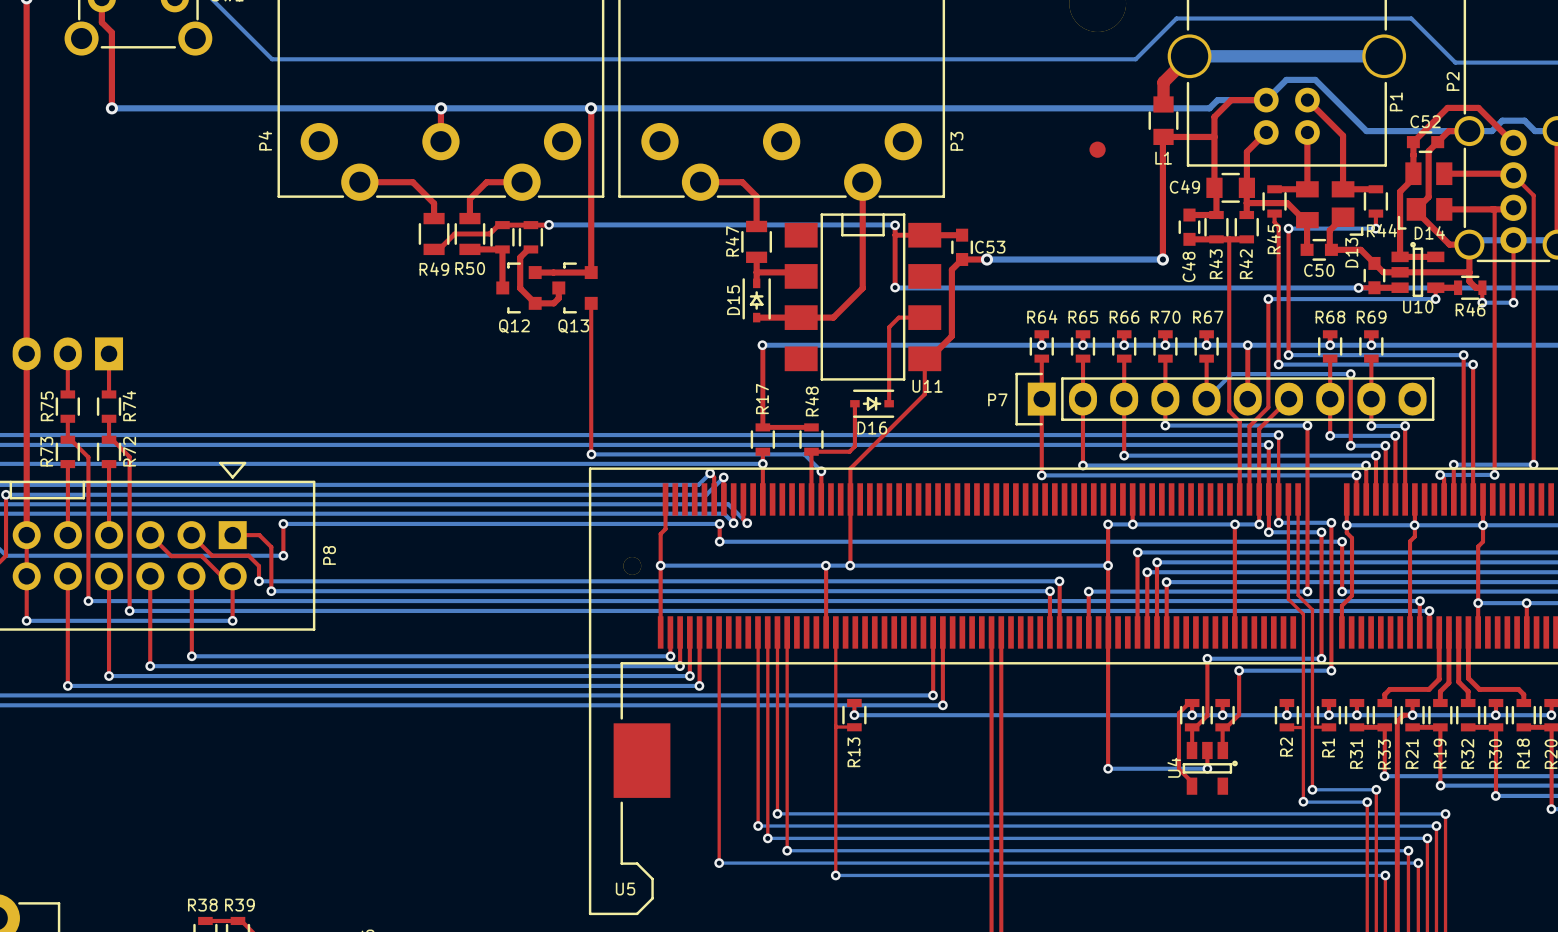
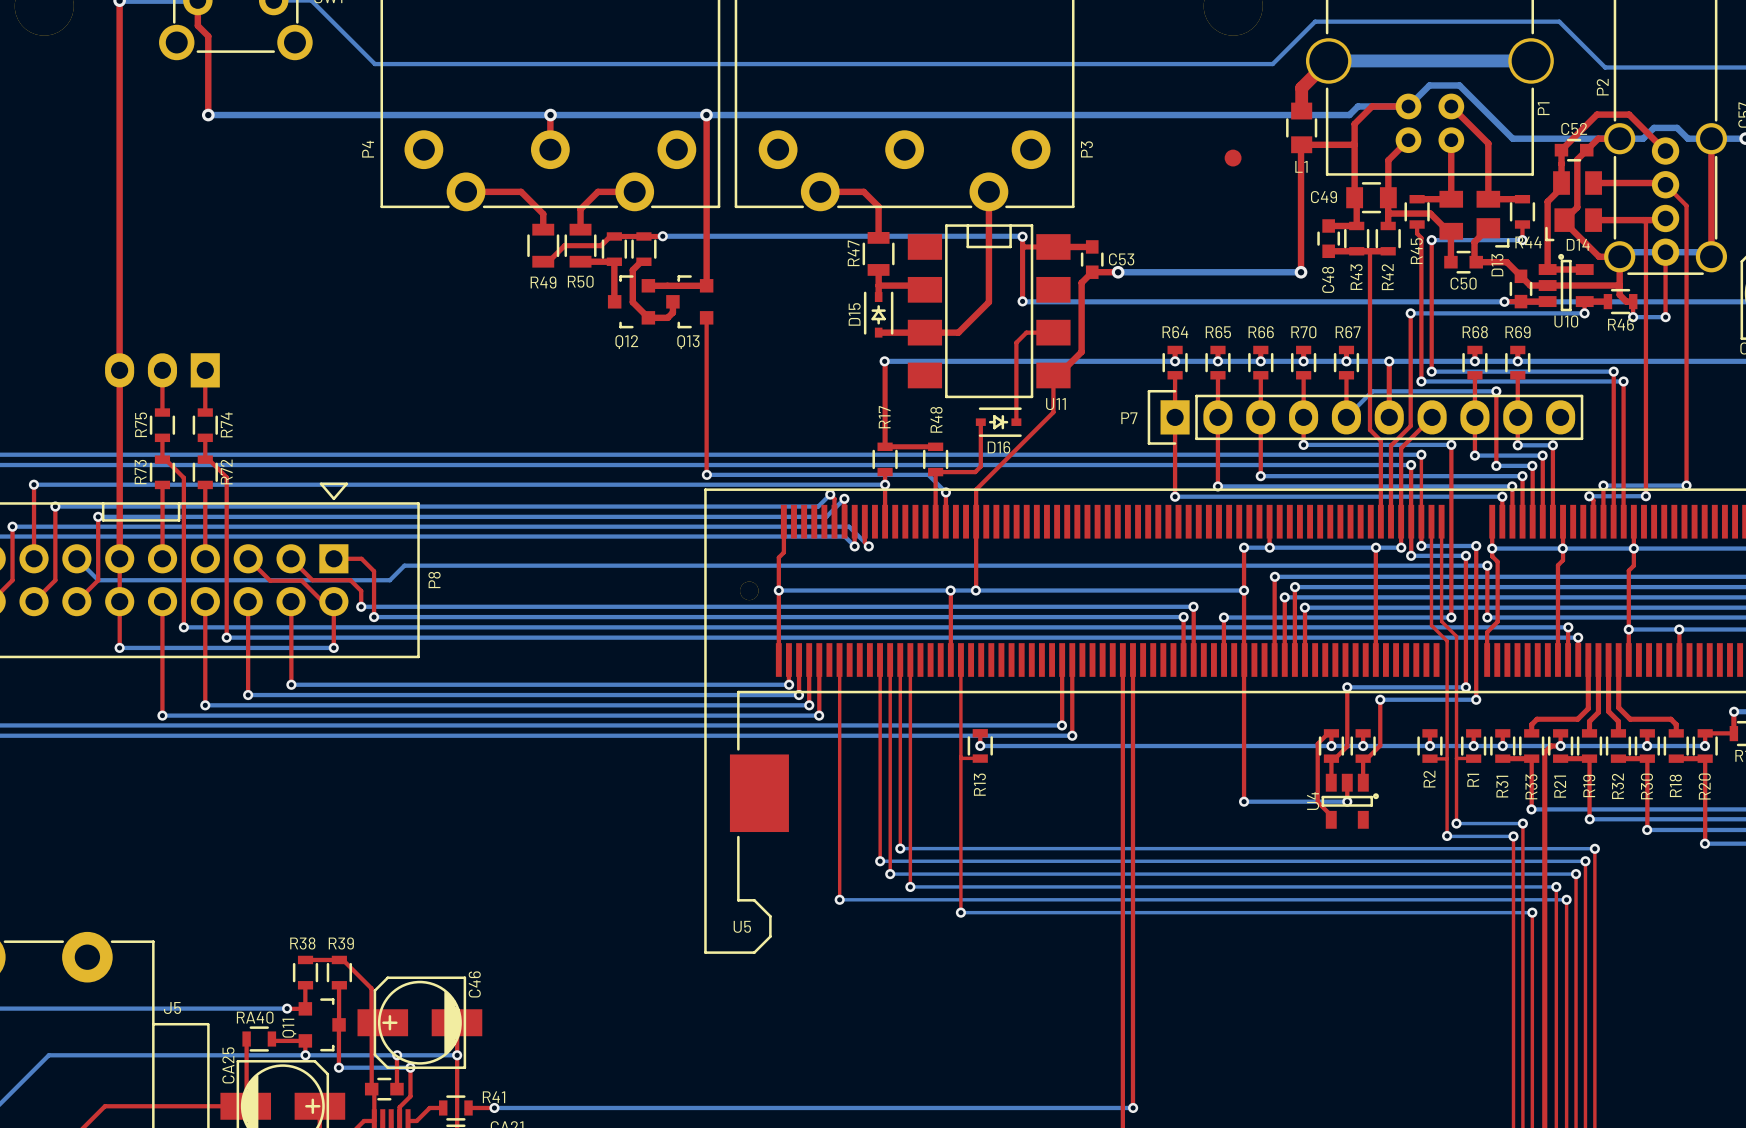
top track: (283, 523) (283, 555) -> none
bottom track: (283, 523) (719, 523) -> none
via: (283, 523) -> none
top track: (719, 523) (719, 541) -> none
via: (719, 523) -> none
bottom track: none -> (840, 565) (404, 565) (389, 580) (386, 580)
via: (719, 541) -> none
via: (283, 555) -> none

